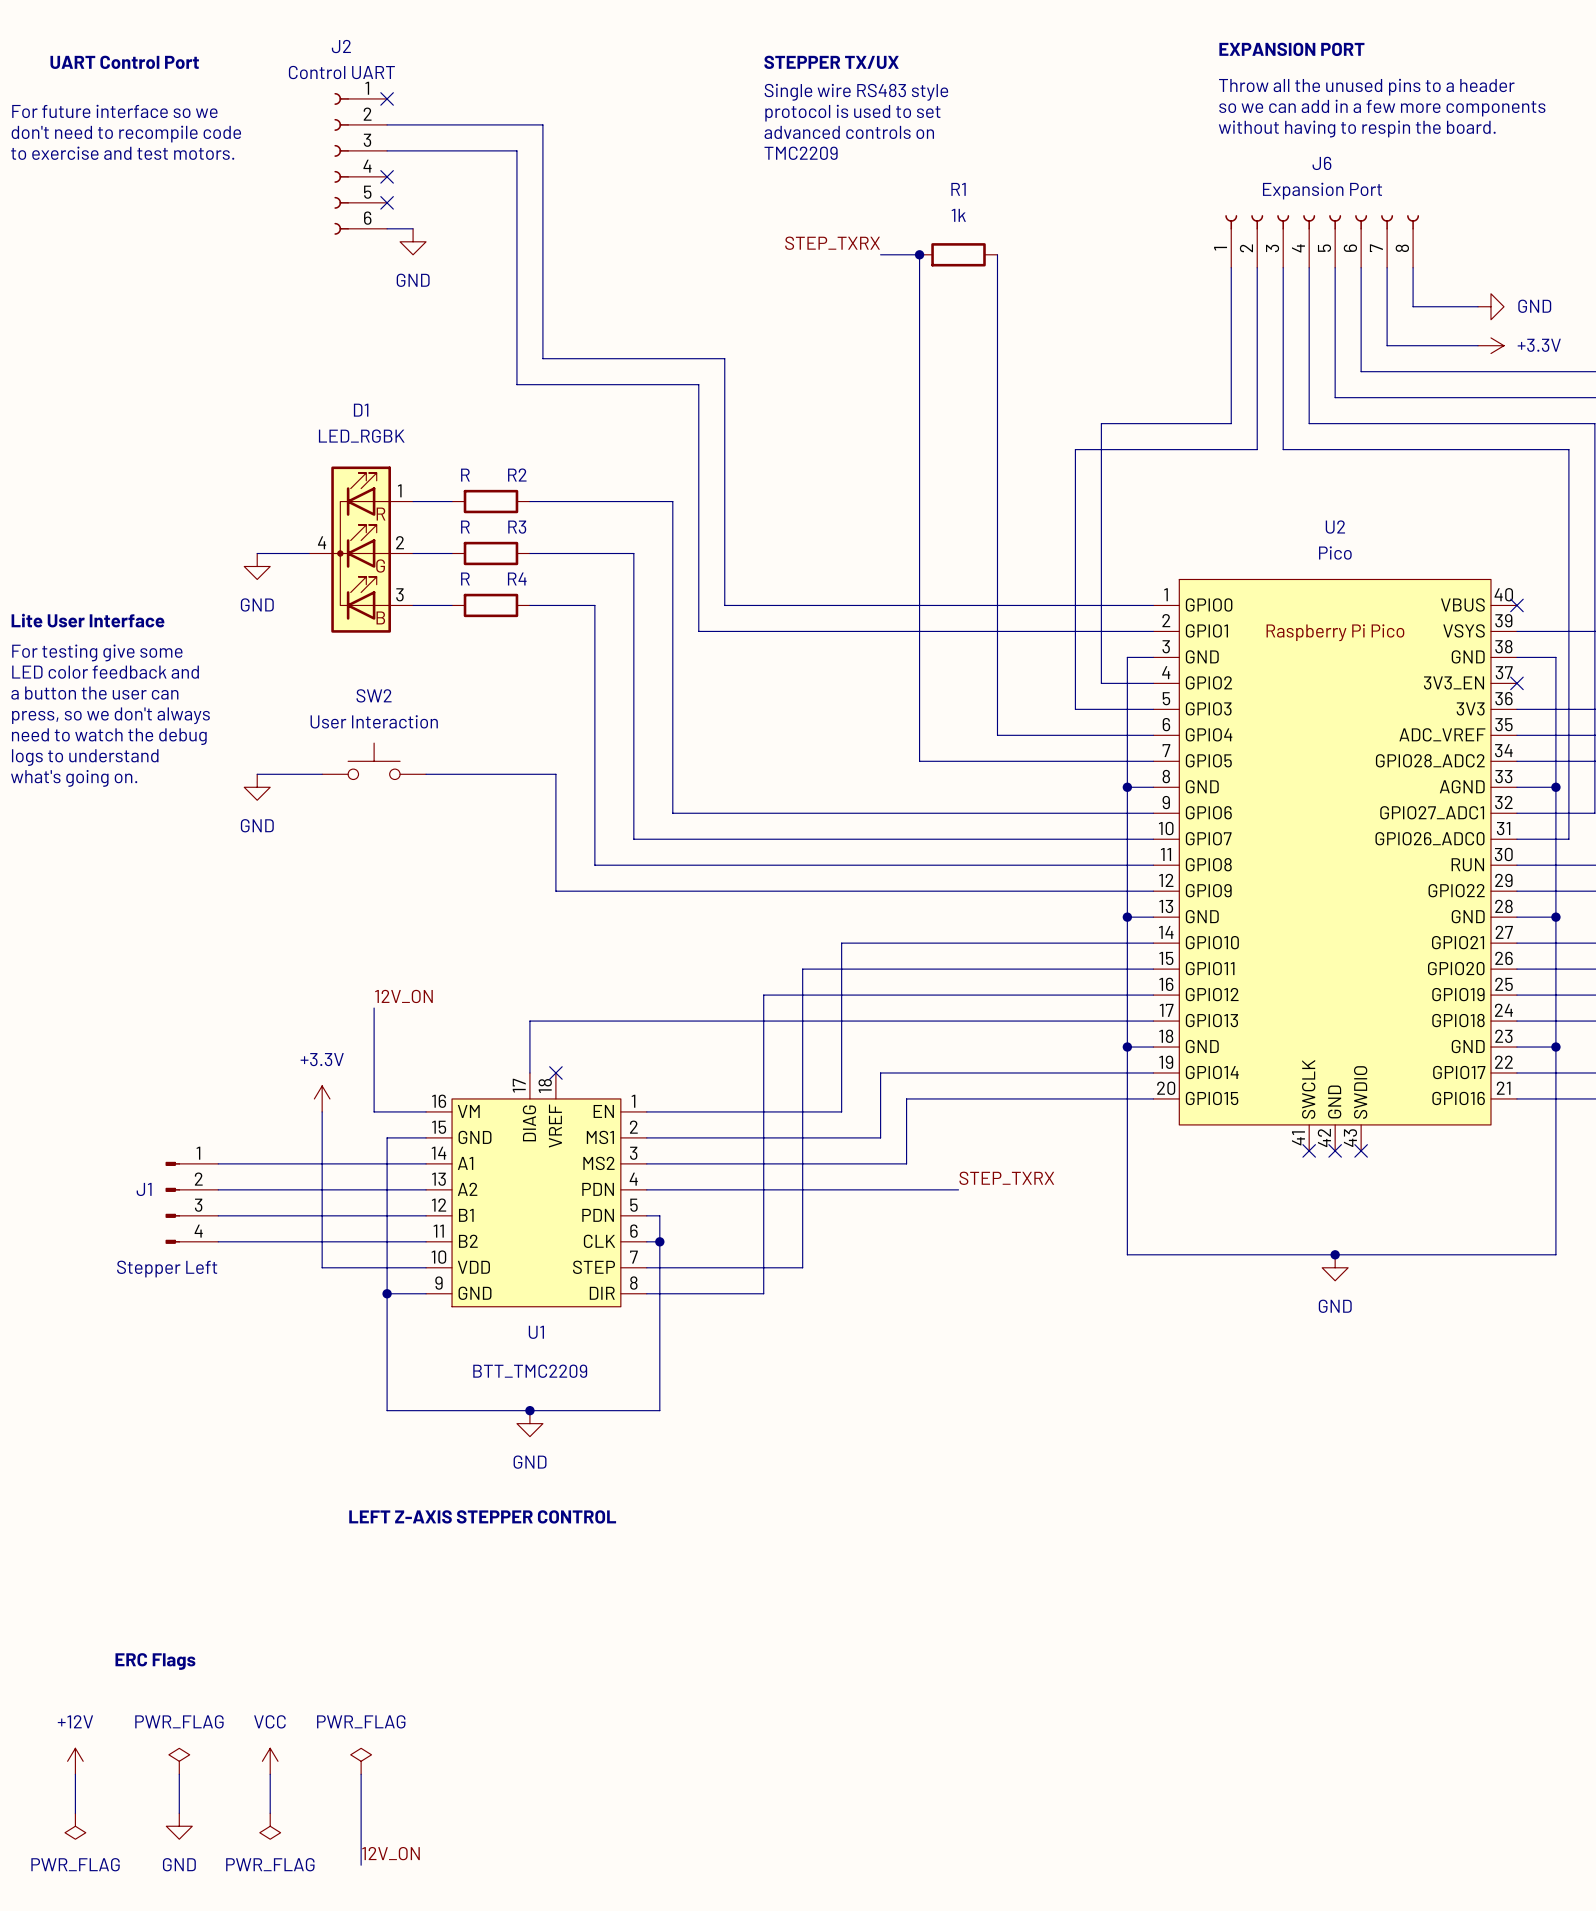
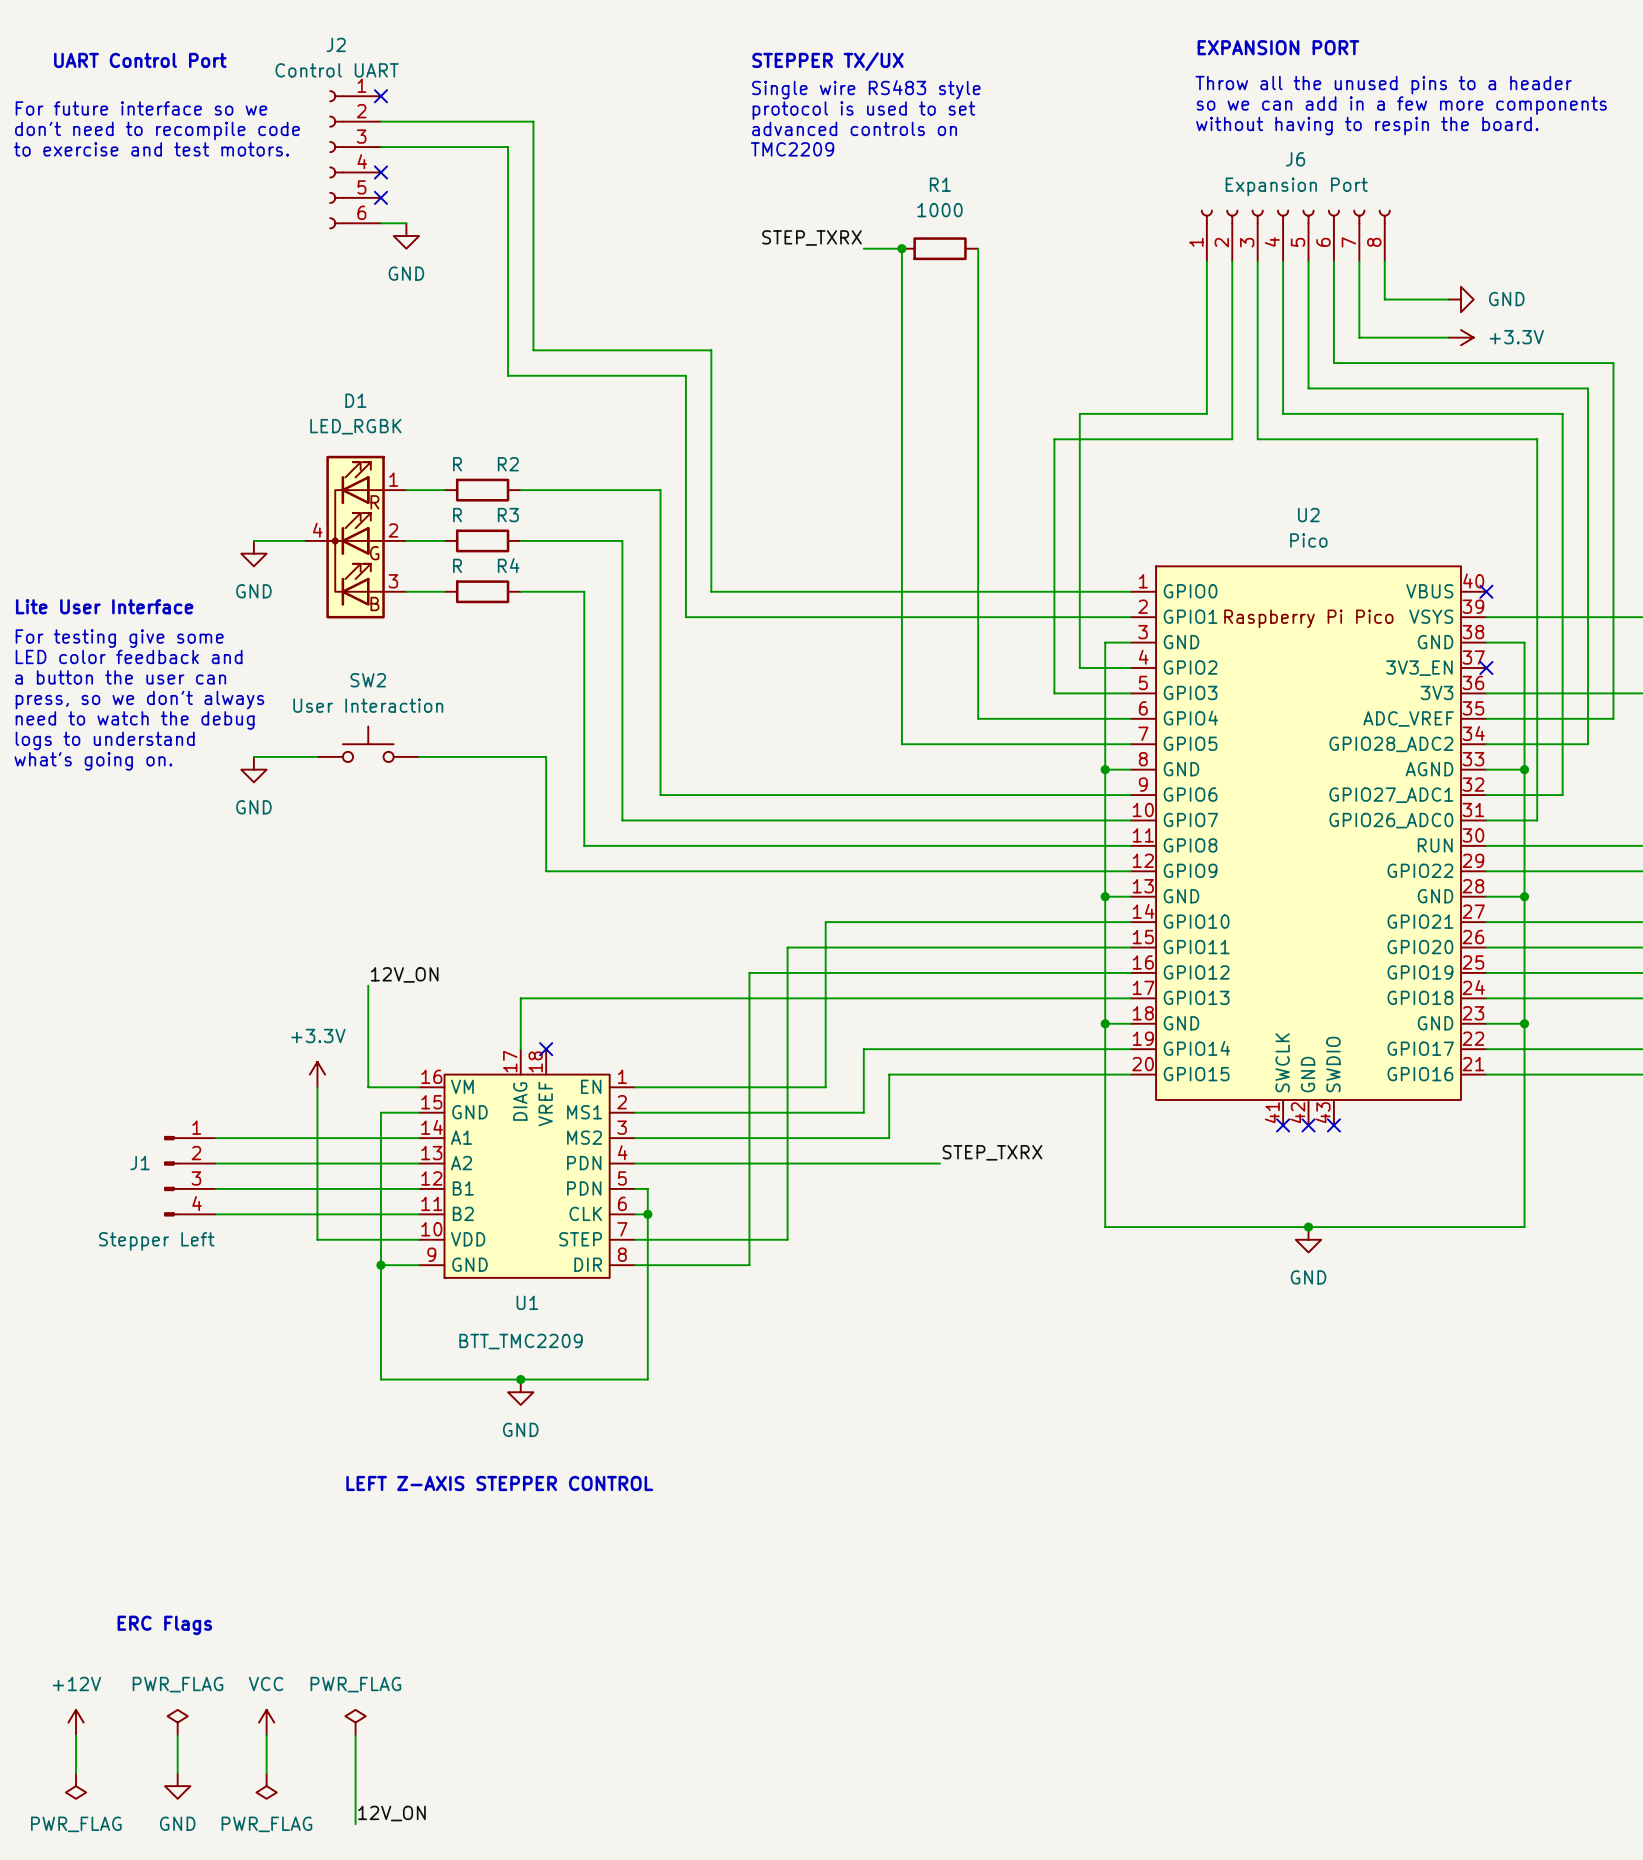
R1 value: 1k (958, 215) -> 1000 (940, 210)

